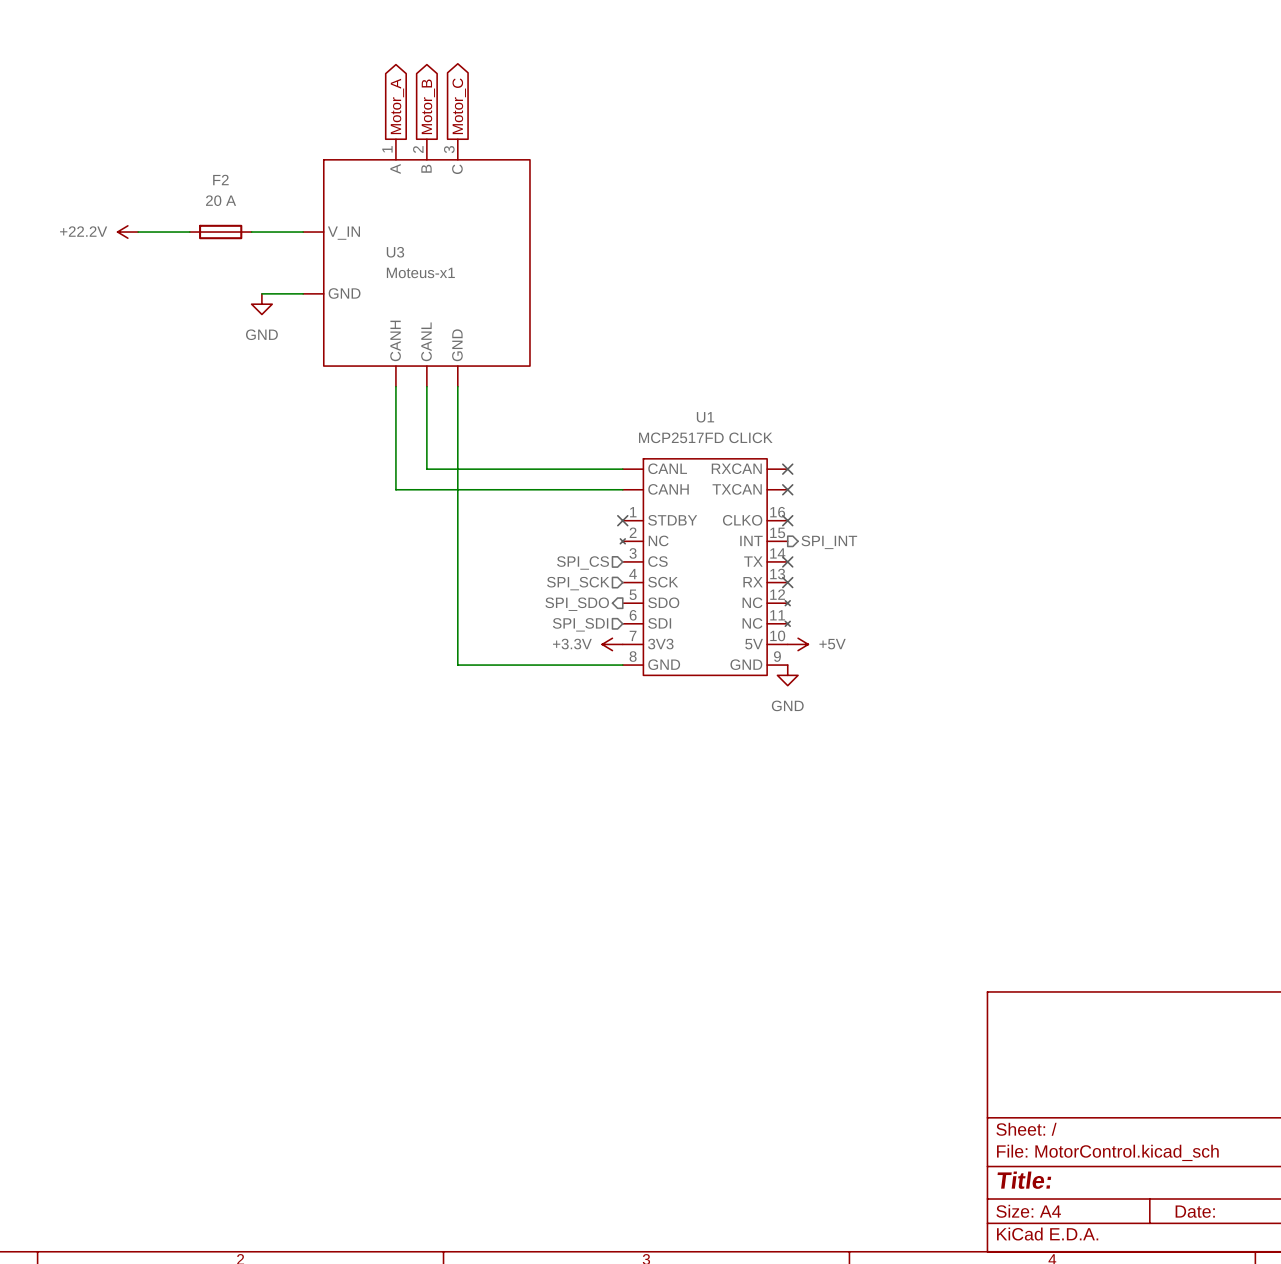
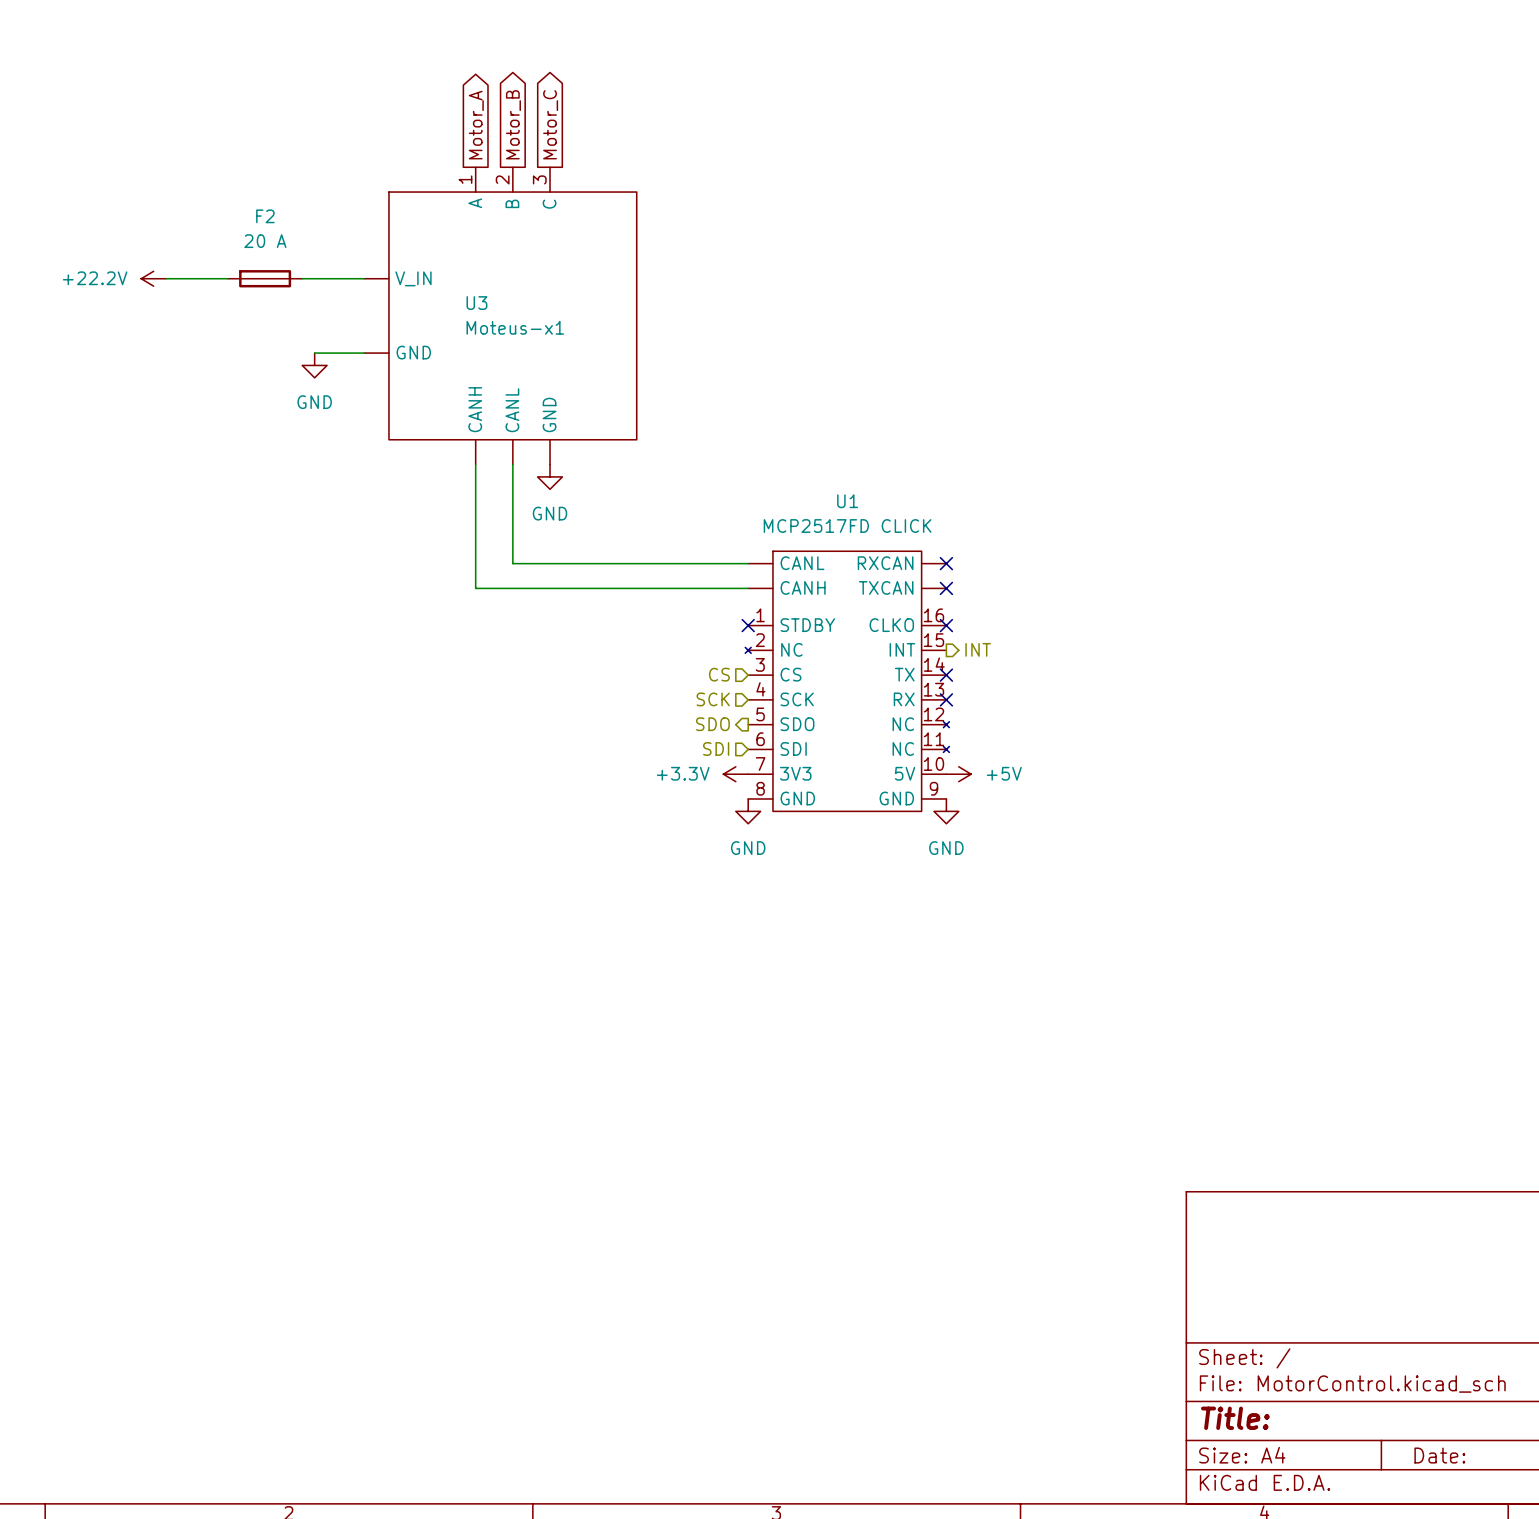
wire: (457, 386) (457, 665) (622, 665) -> none
power symbol: none -> GND (550, 476)
hierarchical label: SPI_INT (829, 542) -> INT (978, 649)
hierarchical label: SPI_CS (583, 562) -> CS (719, 674)
hierarchical label: SPI_SCK (578, 583) -> SCK (713, 699)
hierarchical label: SPI_SDO (577, 604) -> SDO (712, 724)
hierarchical label: SPI_SDI (580, 624) -> SDI (716, 748)
power symbol: none -> GND (748, 811)

